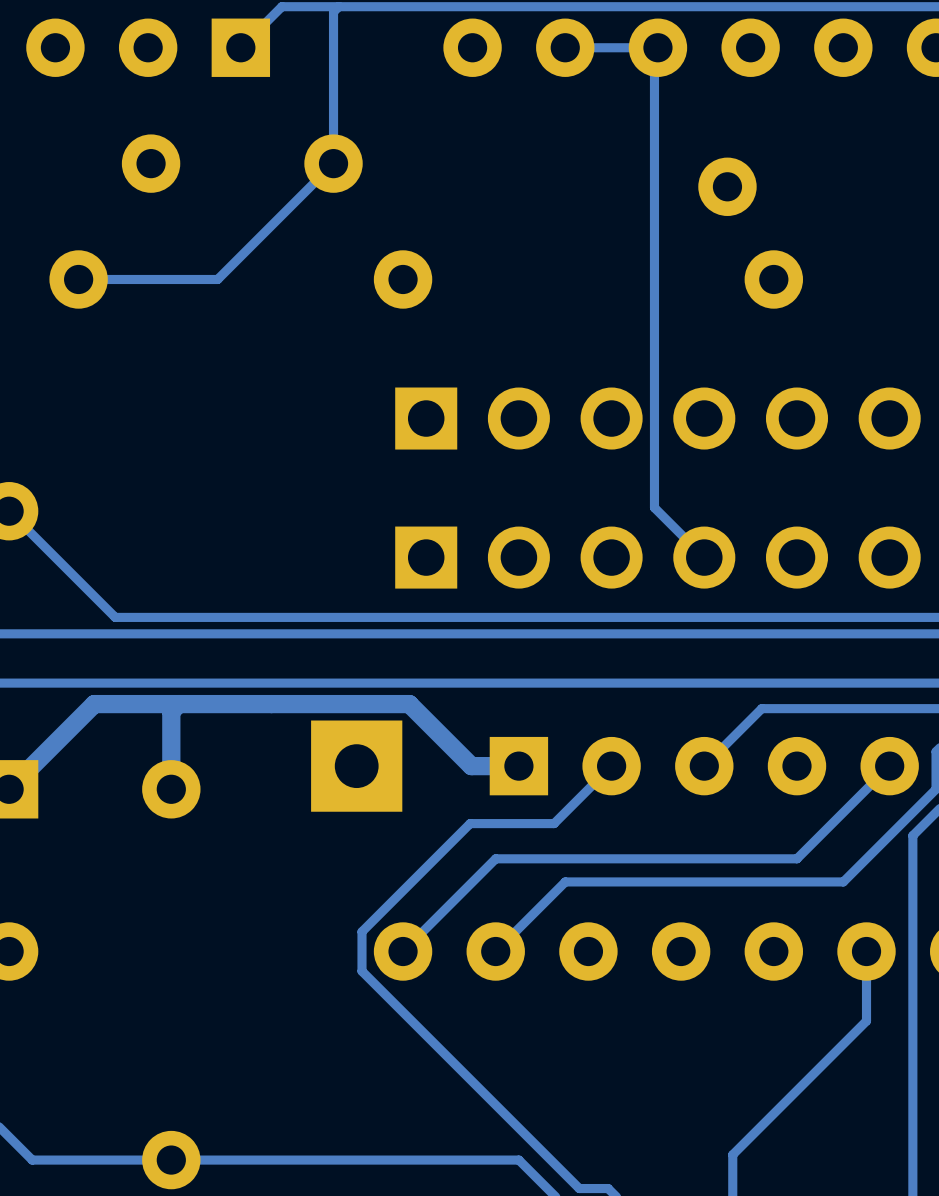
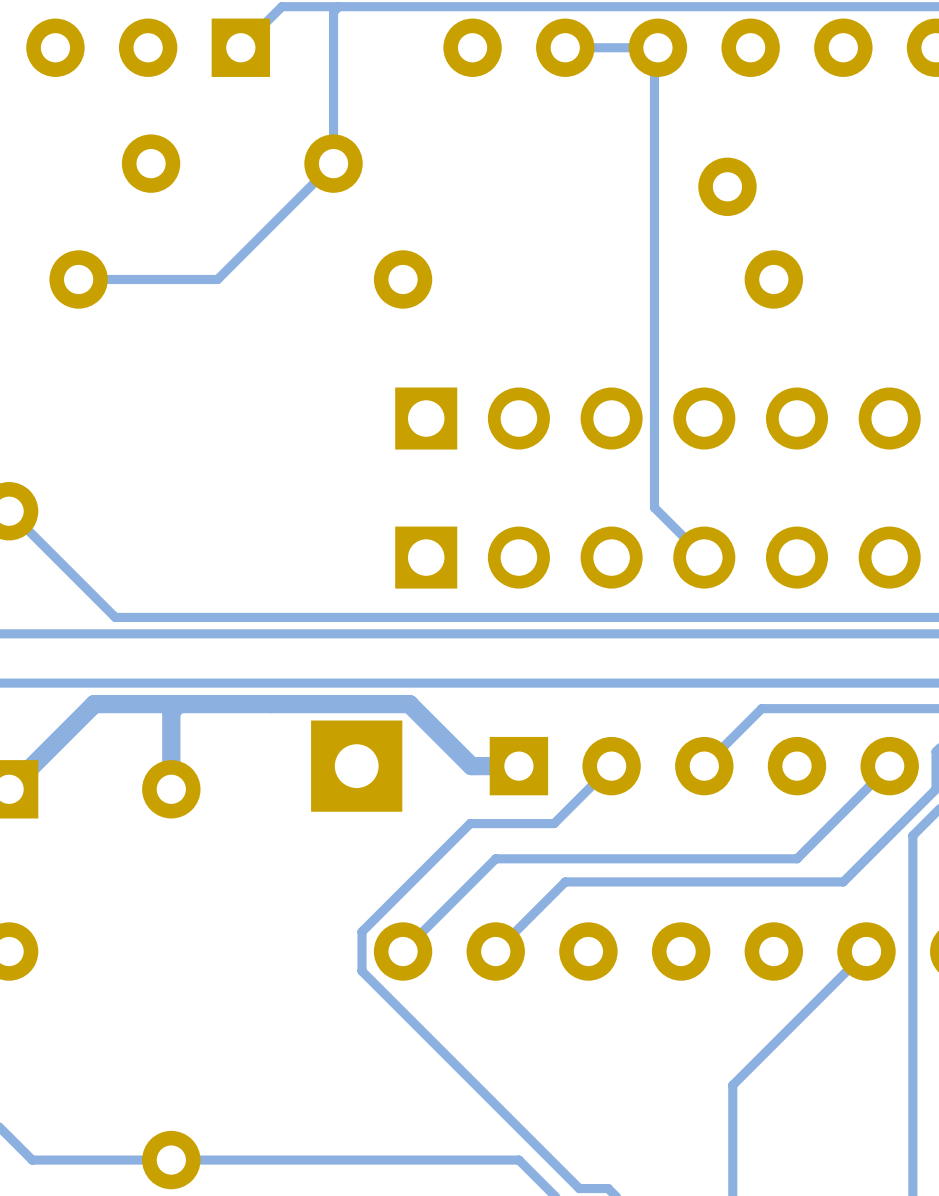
track: (866, 951) (866, 1021) (732, 1154) -> (866, 951) (732, 1085) (732, 1154)

